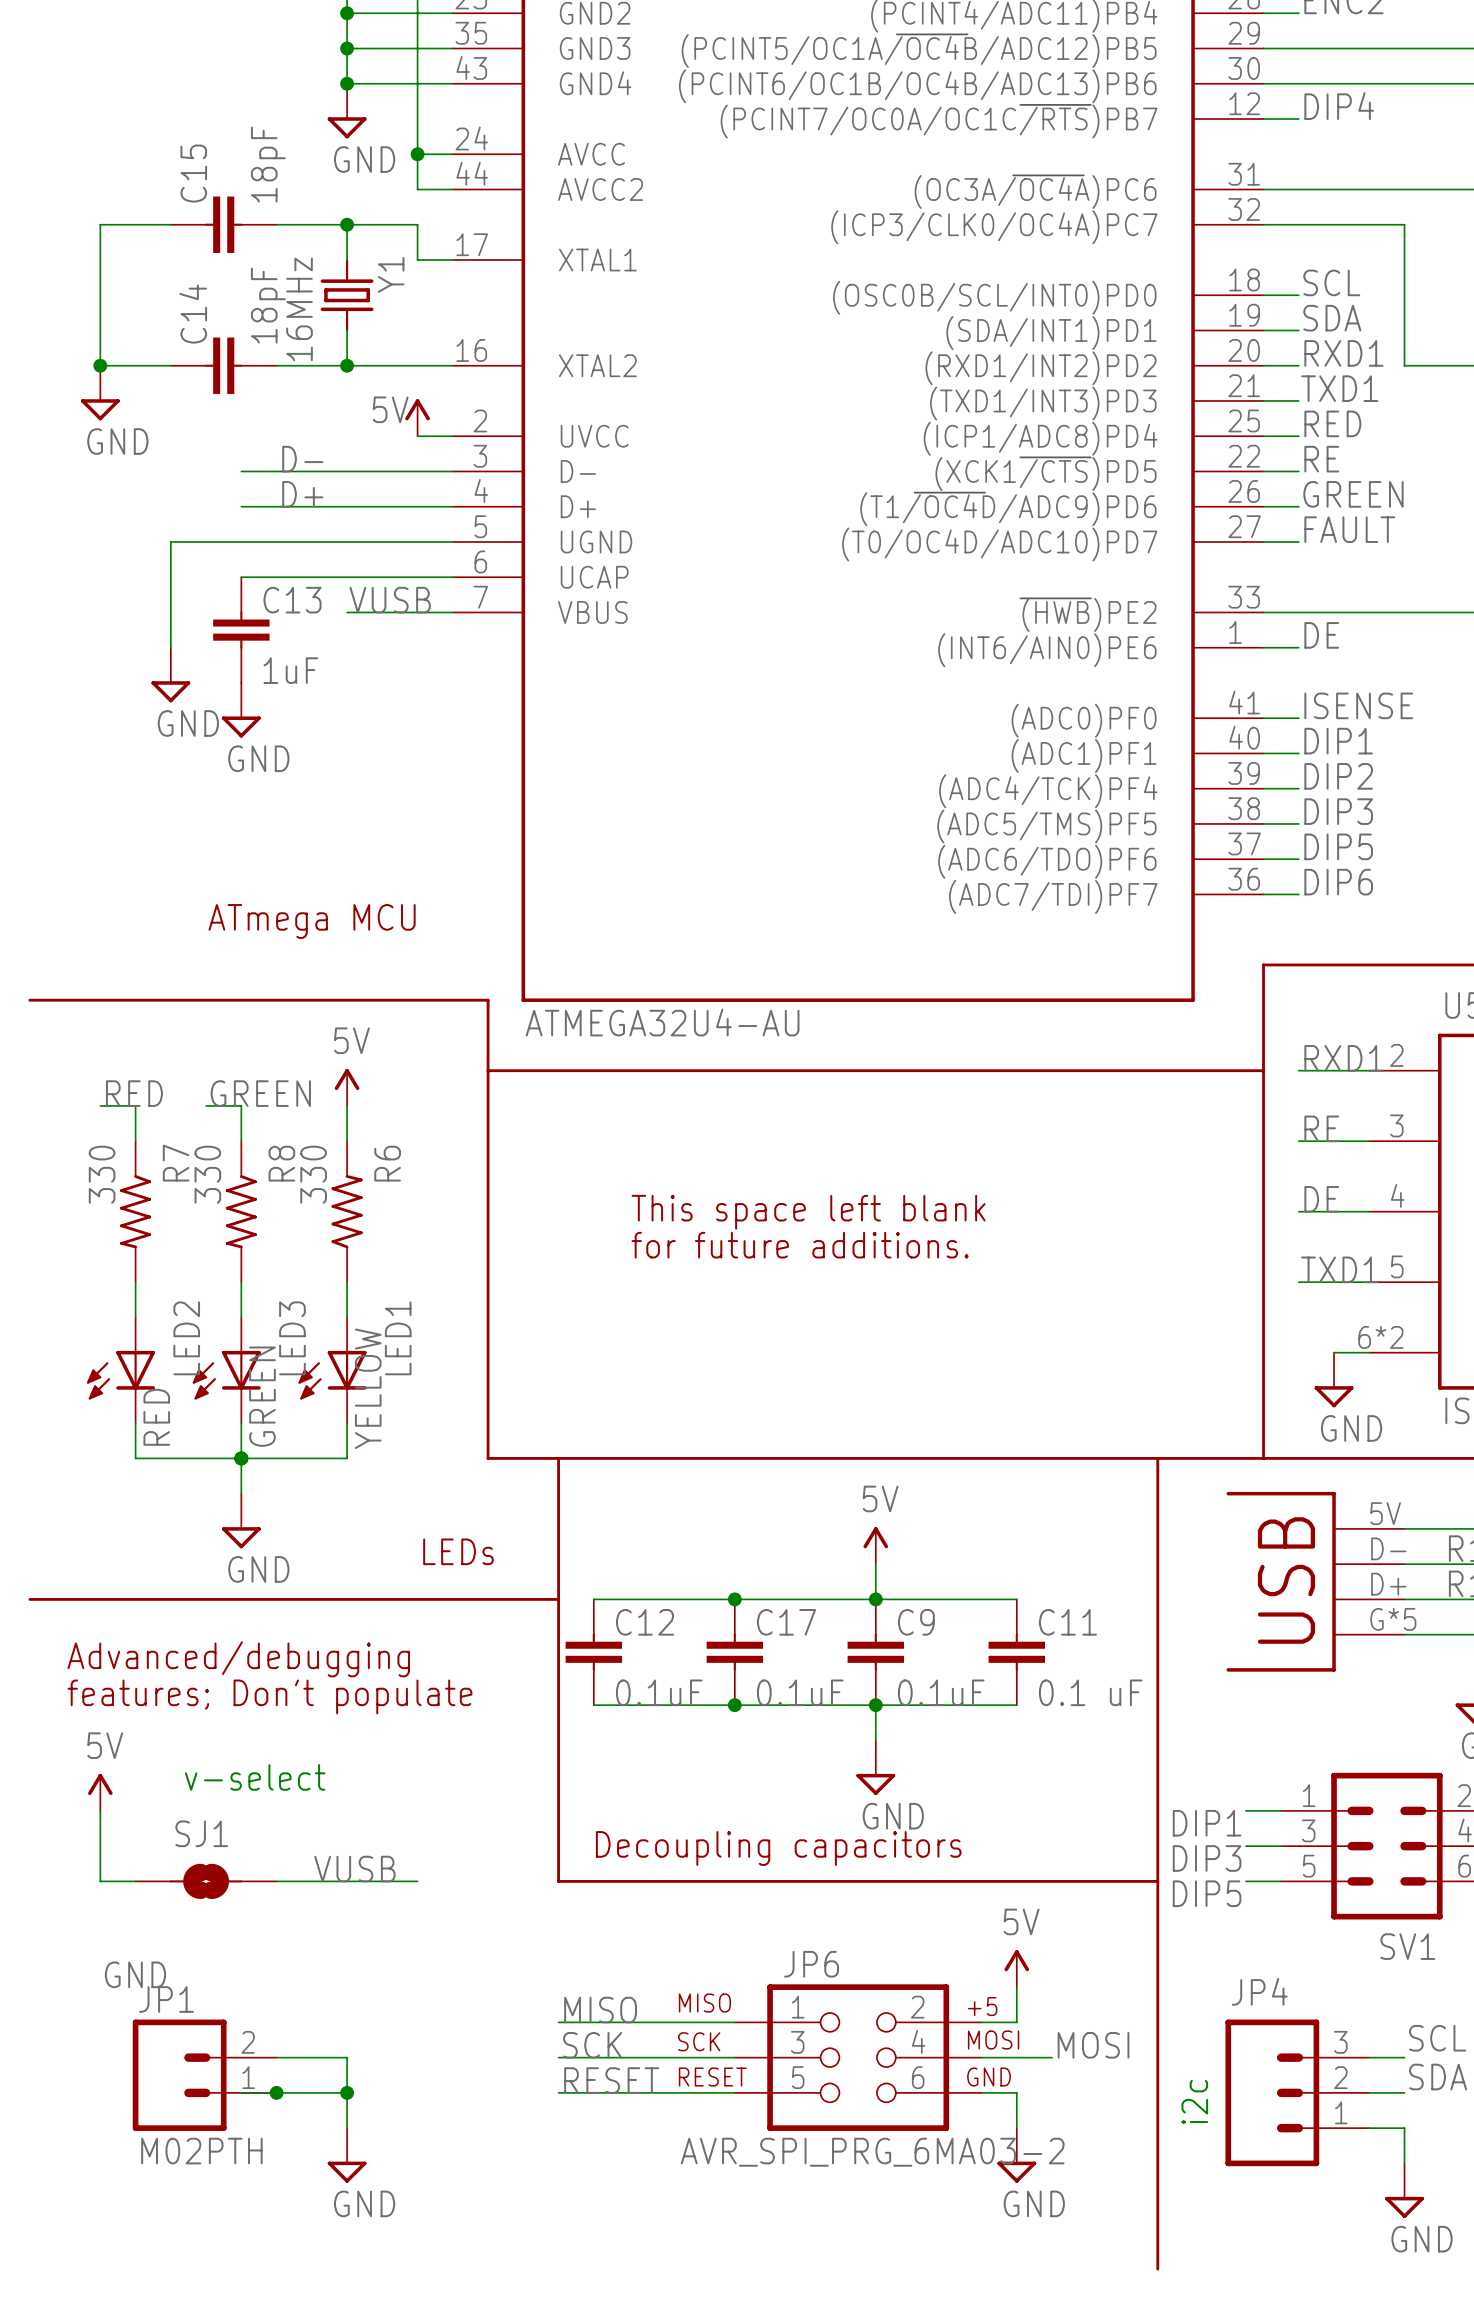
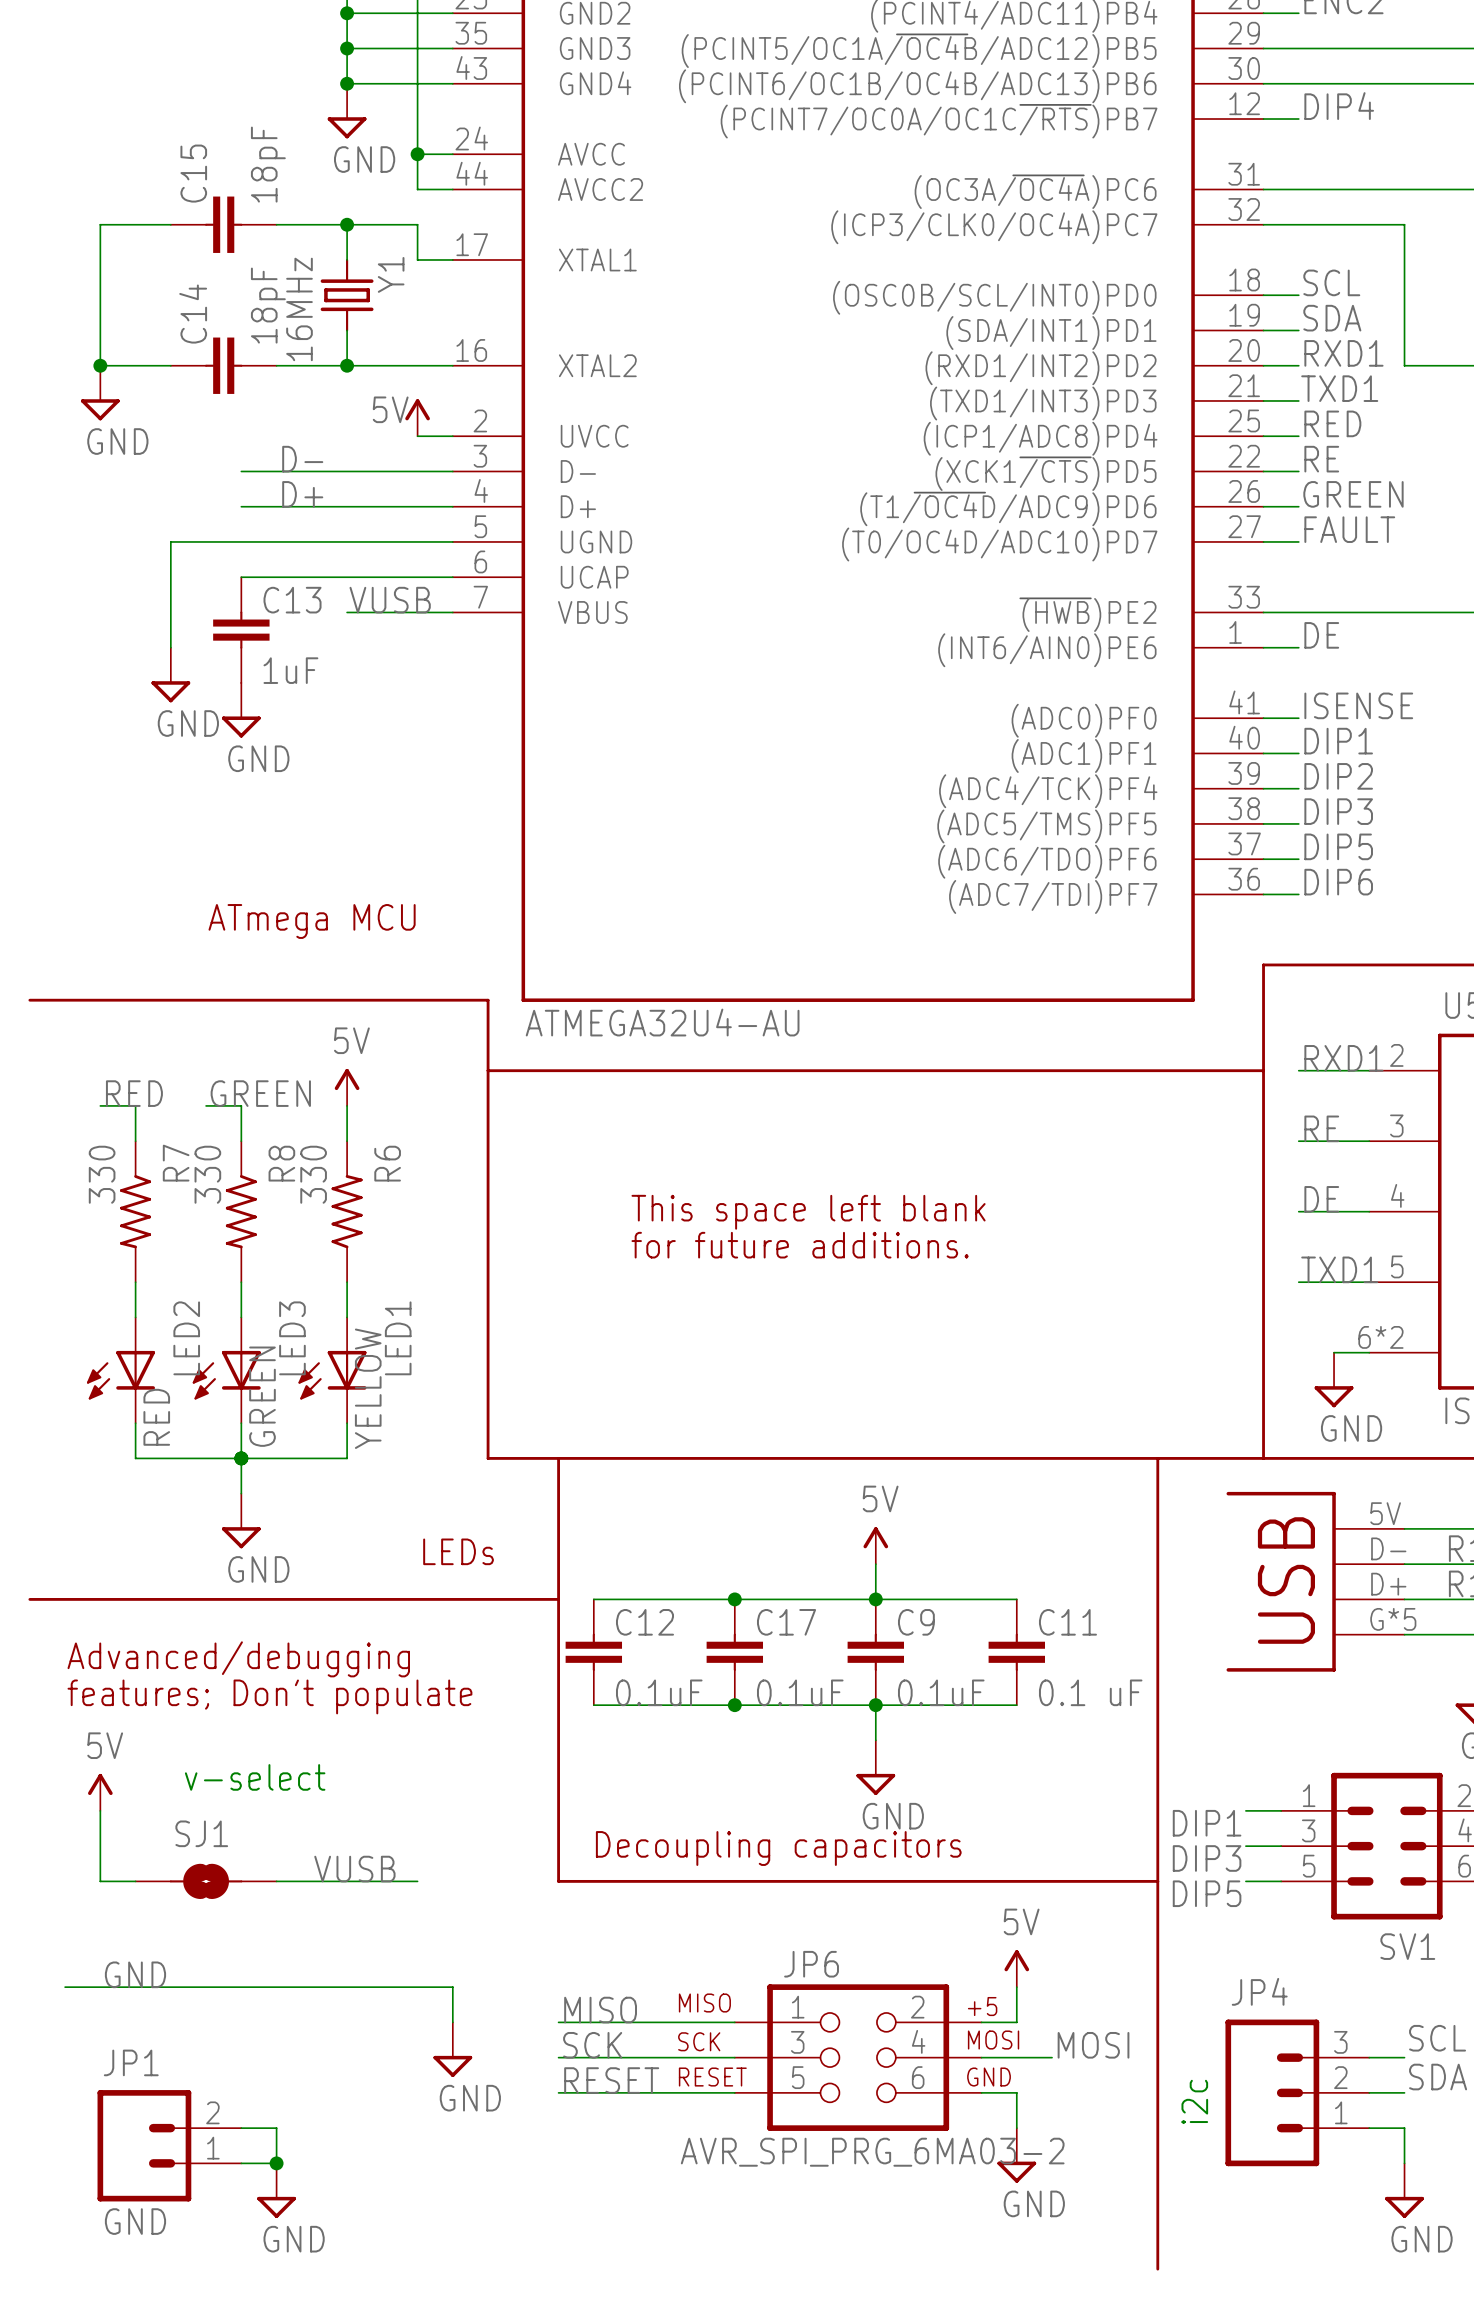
wire: none -> (65, 1987) (452, 1987) (452, 2022)
JP1 name position: JP1 (166, 1999) -> JP1 (131, 2062)
power symbol: none -> GND (452, 2049)
wire: (276, 2057) (347, 2057) (347, 2128) -> none
JP1 position: (204, 2075) -> (169, 2145)
wire: (241, 2092) (347, 2092) -> none
junction: (276, 2092) -> none
junction: (347, 2092) -> none
wire: none -> (241, 2128) (276, 2128) (276, 2163) (241, 2163)
JP1 value: M02PTH (201, 2151) -> GND (135, 2221)
power symbol: GND (347, 2155) -> none
junction: none -> (276, 2163)
power symbol: none -> GND (276, 2190)

